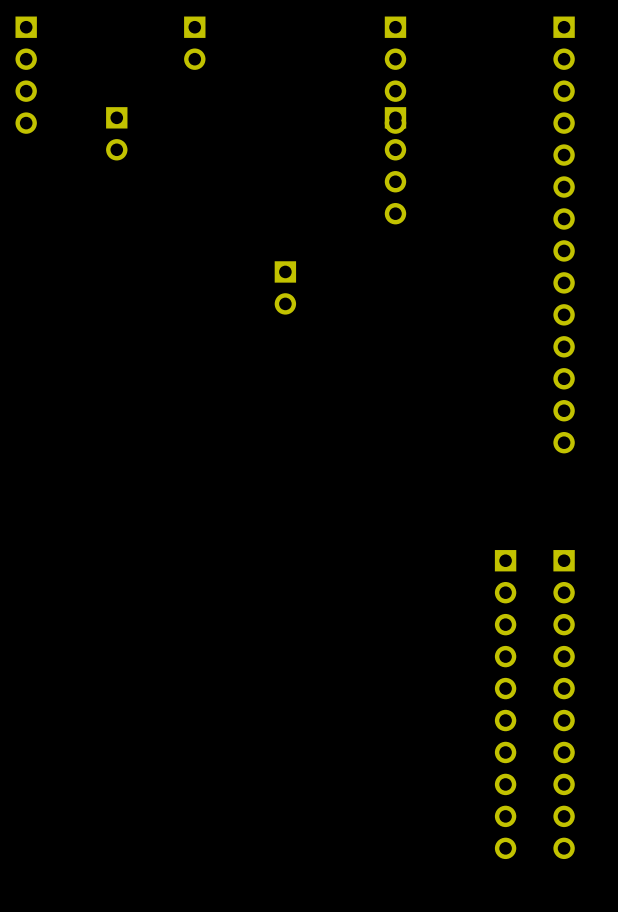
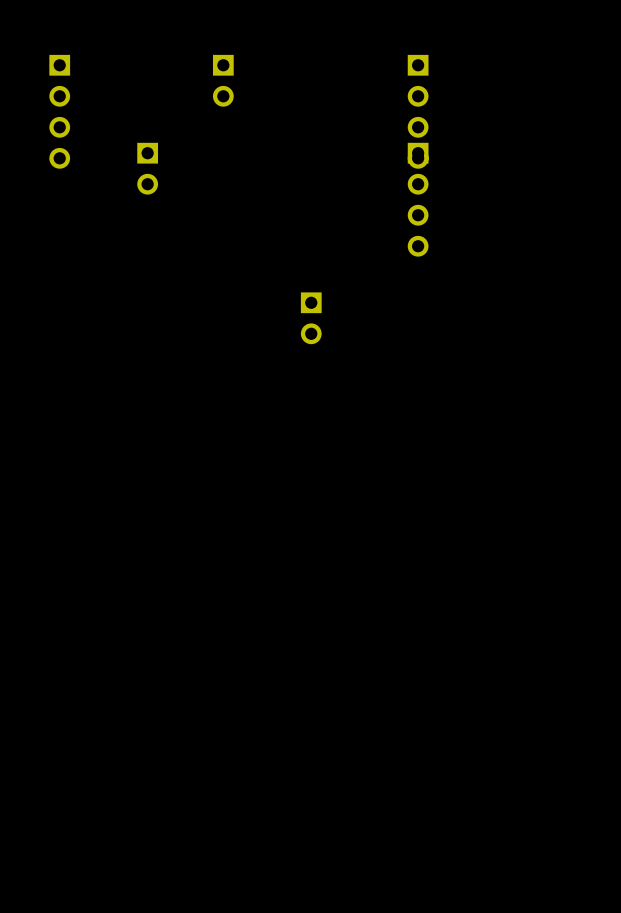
part: (564, 234) -> none
part: (505, 704) -> none
part: (564, 704) -> none

